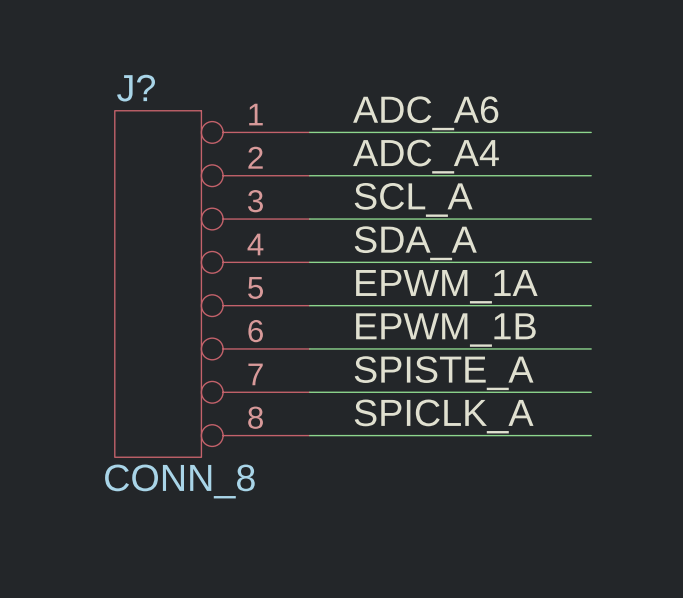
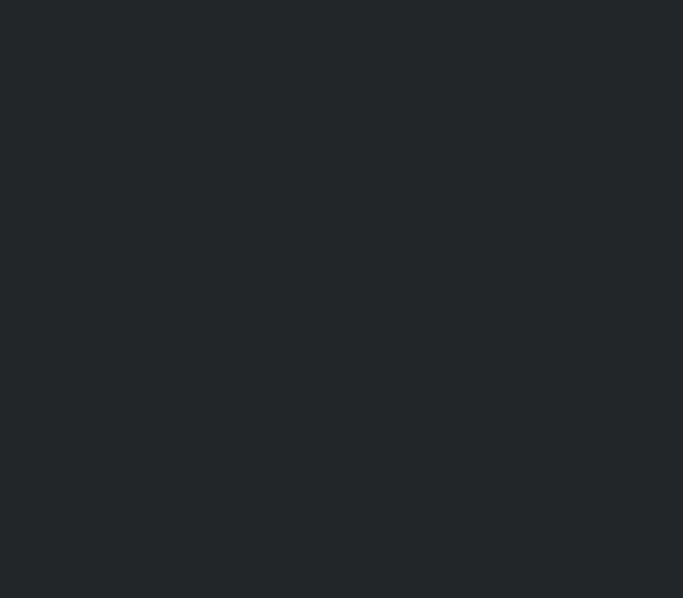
label: ADC_A6 (425, 113) -> none
wire: (309, 132) (591, 132) -> none
label: ADC_A4 (425, 156) -> none
wire: (309, 175) (591, 175) -> none
label: SCL_A (413, 199) -> none
wire: (309, 219) (591, 219) -> none
label: SDA_A (415, 243) -> none
wire: (309, 262) (591, 262) -> none
J?: CONN_8 (212, 284) -> none
label: EPWM_1A (446, 286) -> none
wire: (309, 305) (591, 305) -> none
label: EPWM_1B (445, 330) -> none
wire: (309, 348) (591, 348) -> none
label: SPISTE_A (444, 373) -> none
wire: (309, 392) (591, 392) -> none
label: SPICLK_A (444, 416) -> none
wire: (309, 435) (591, 435) -> none

